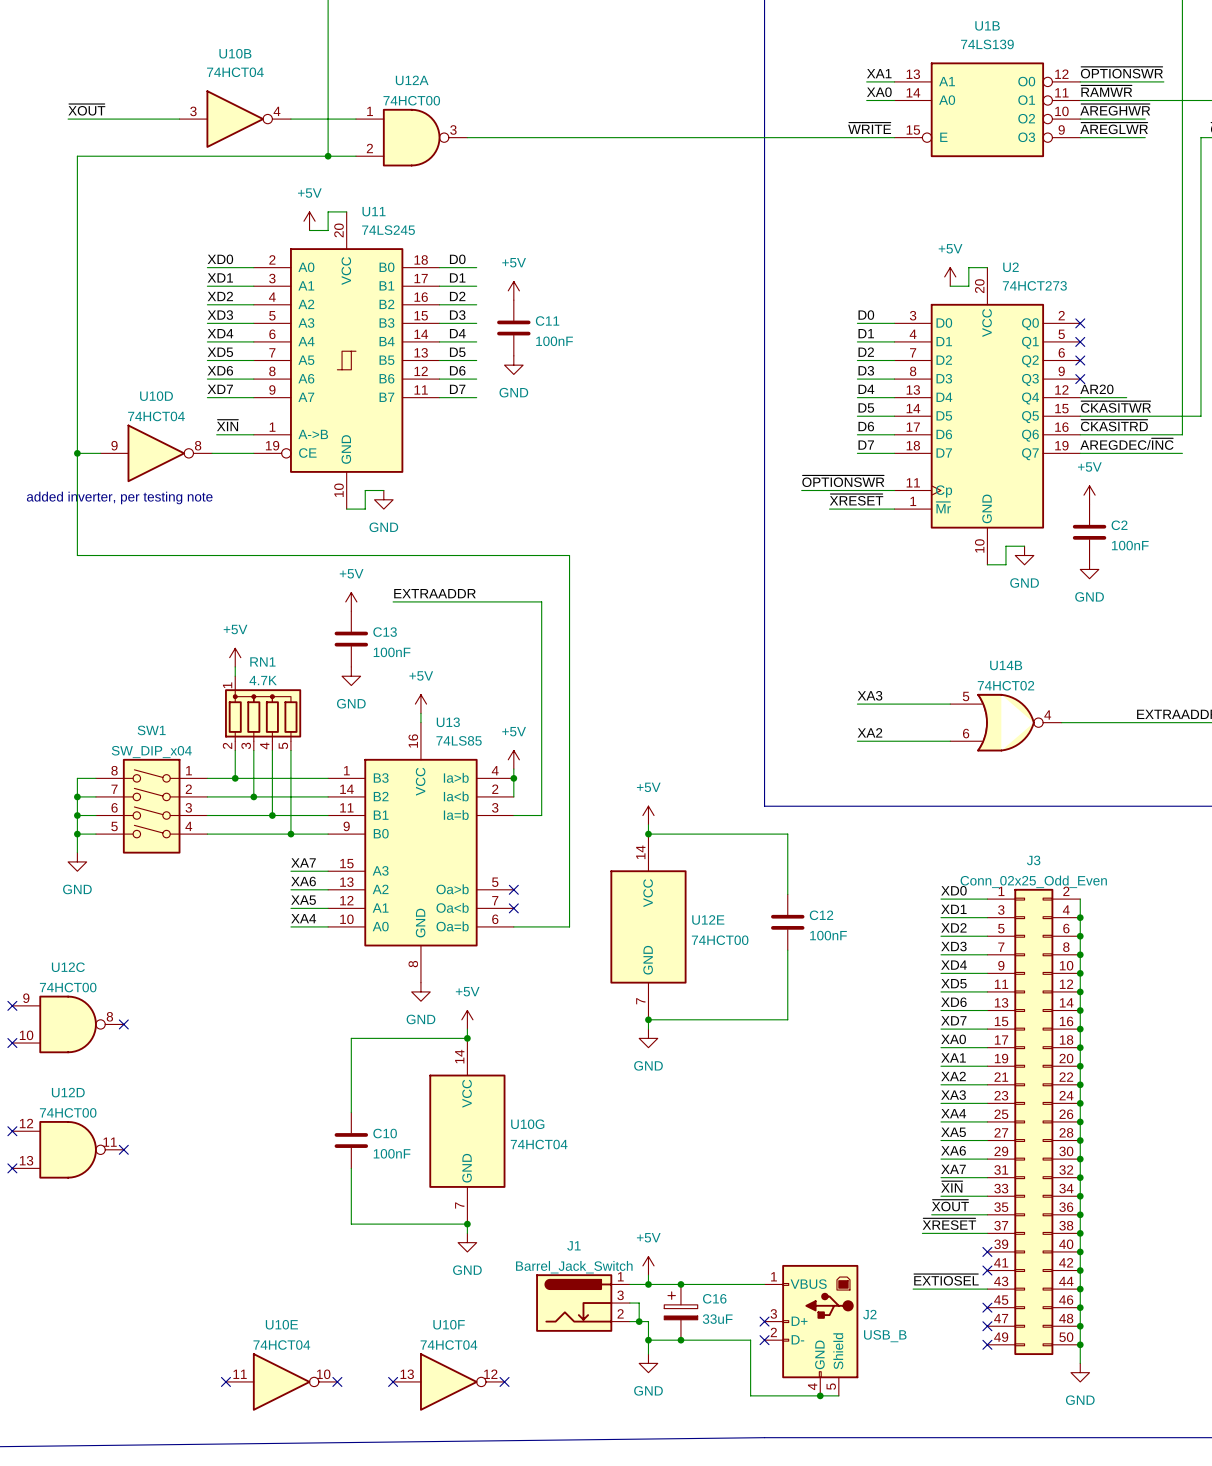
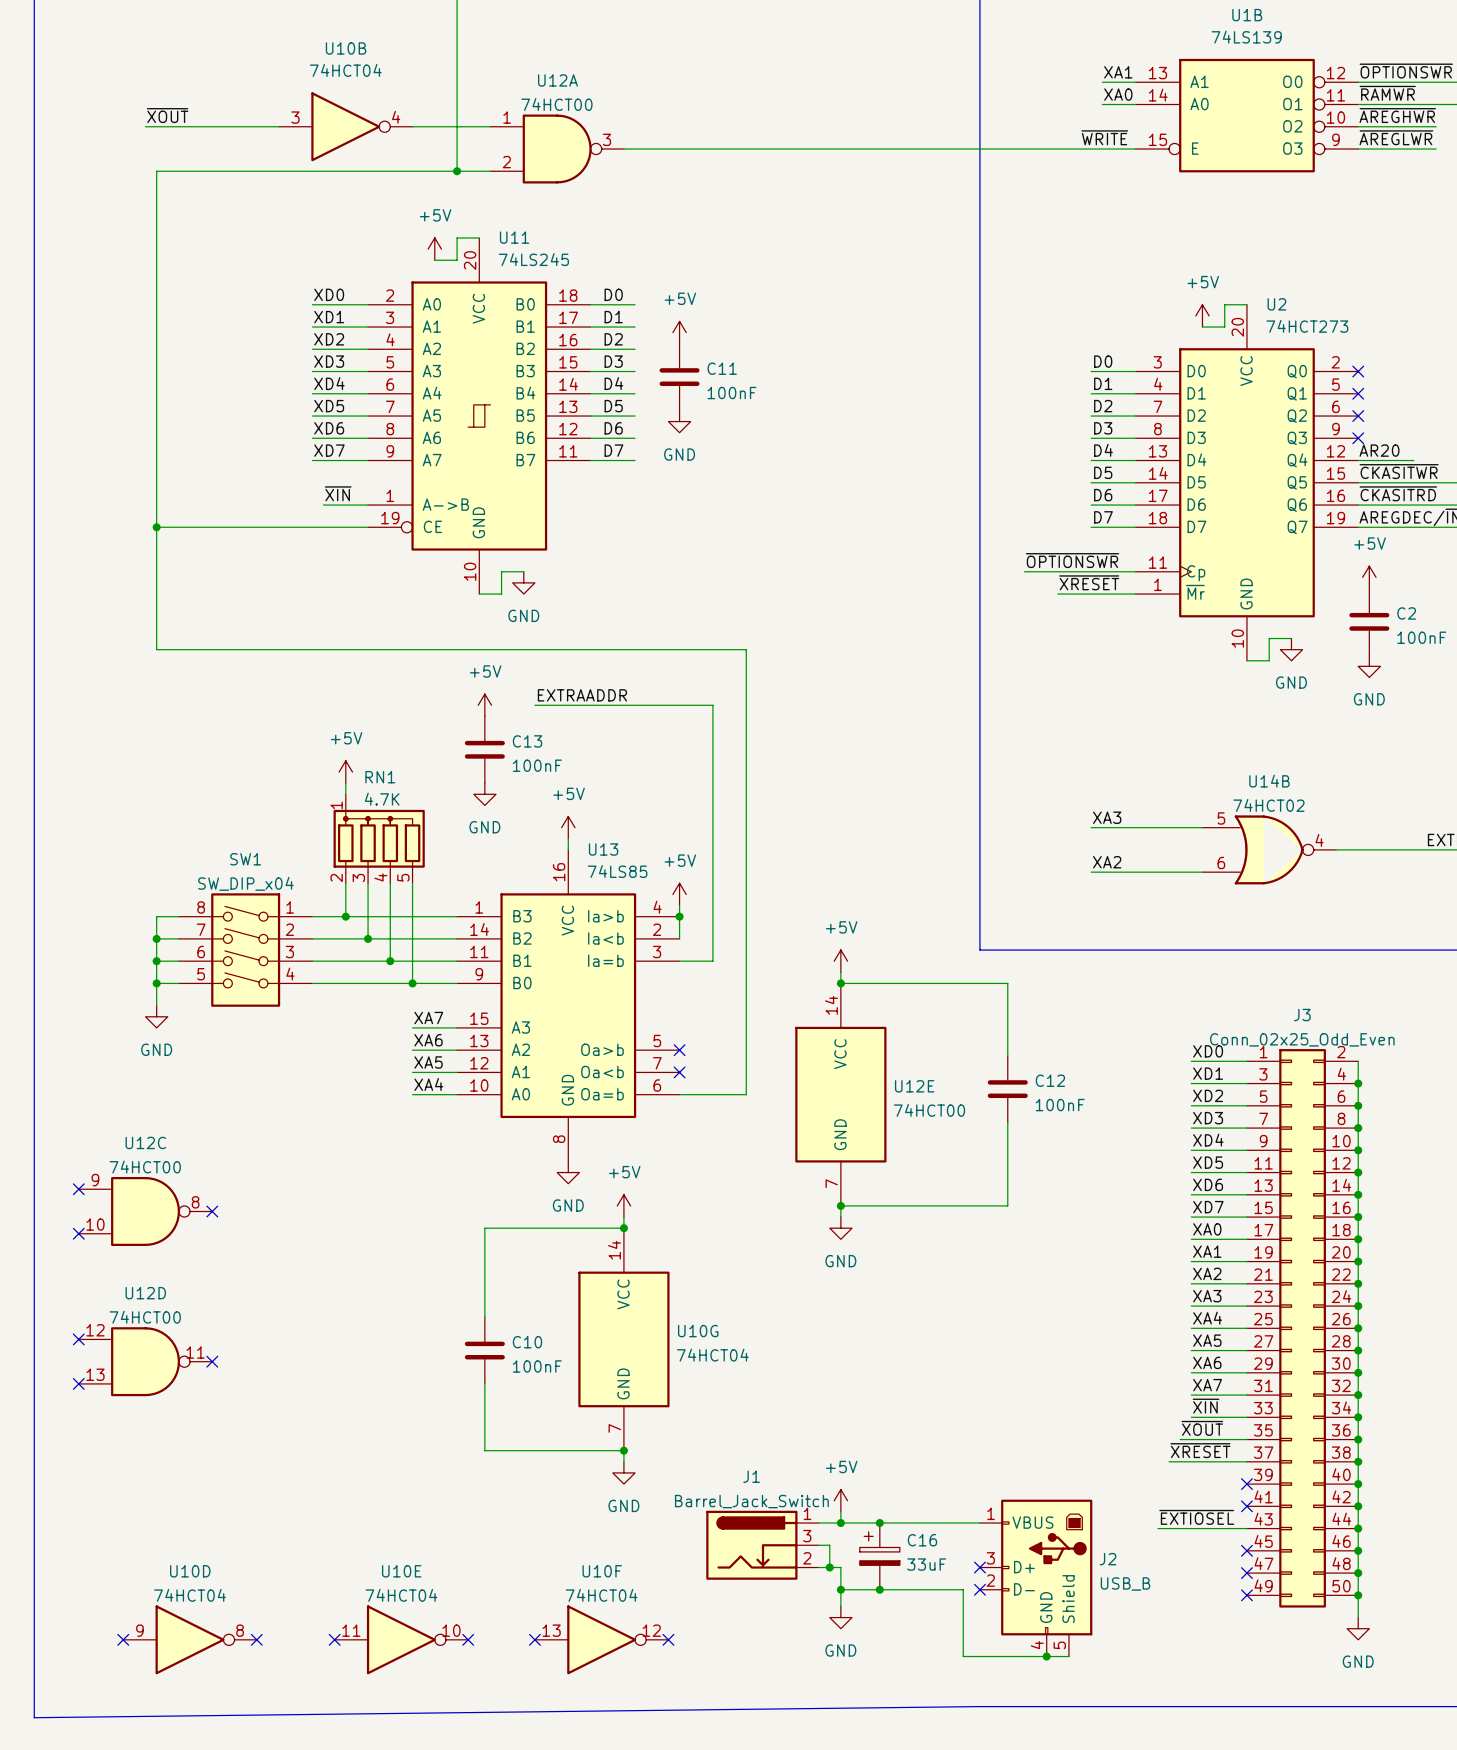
U10D position: (156, 453) -> (190, 1639)
text: added inverter, per testing note (119, 497) -> none
no-connect mark: none -> (123, 1639)
no-connect mark: none -> (256, 1639)

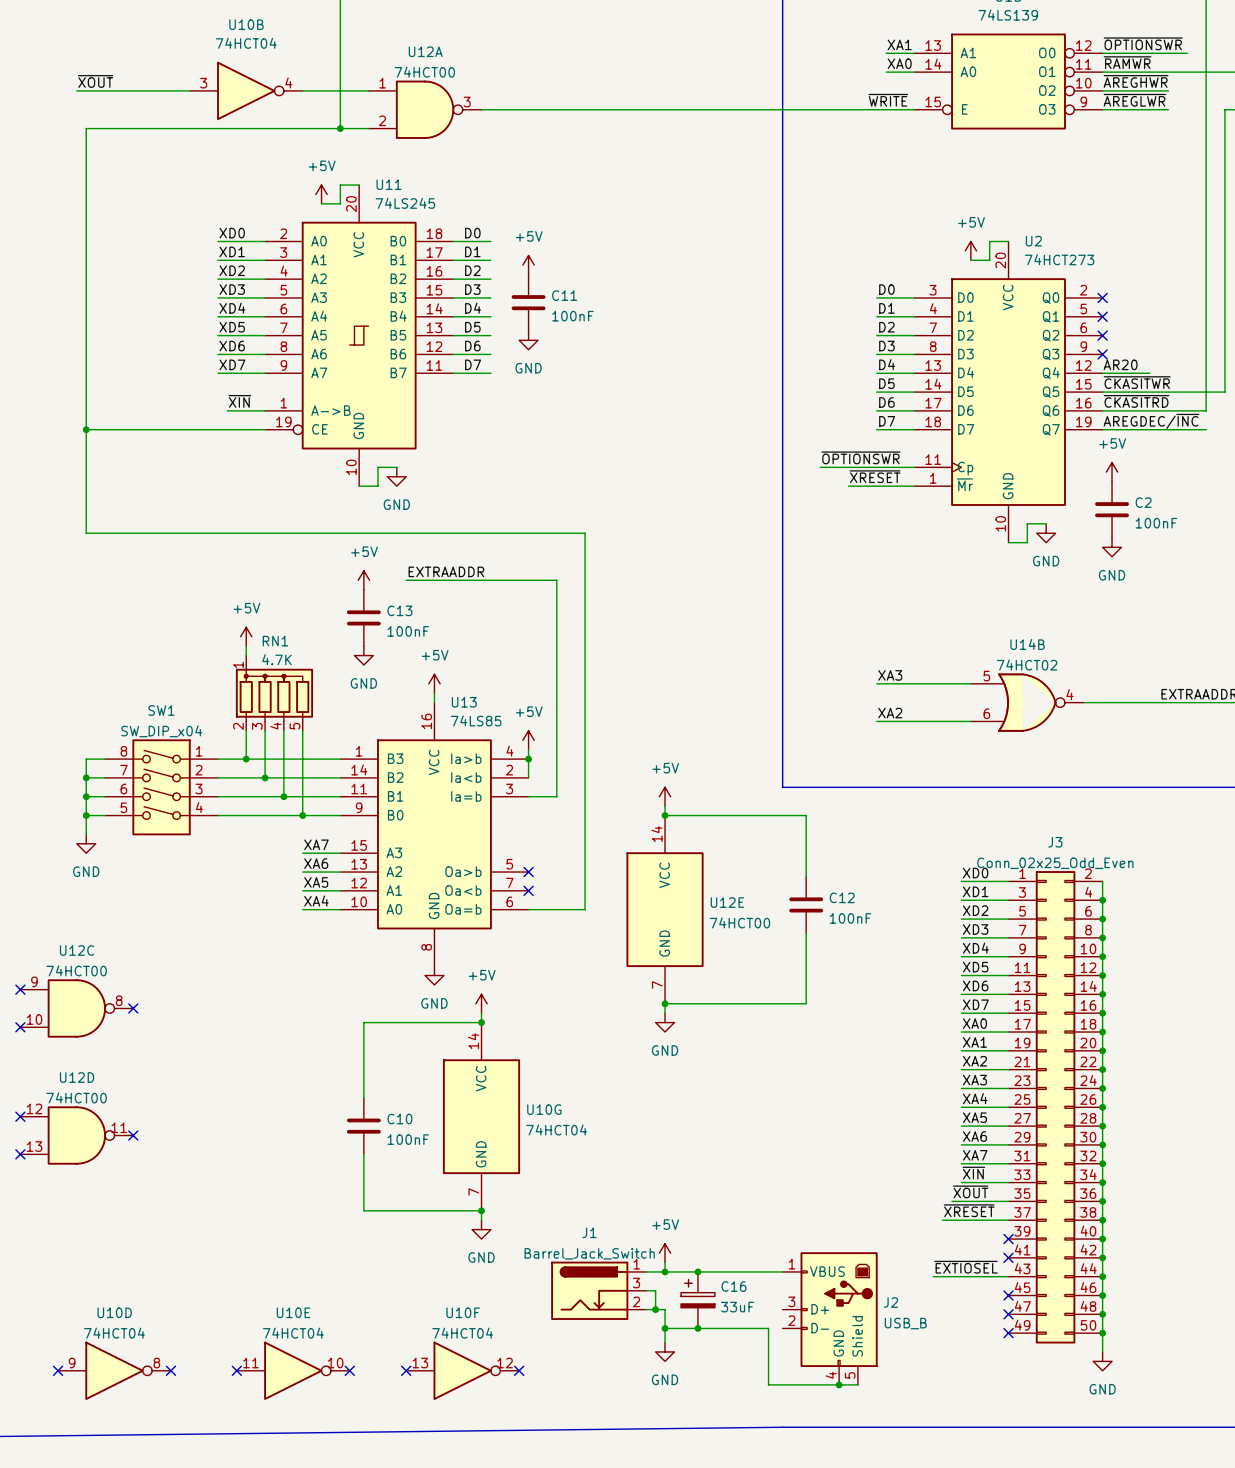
no-connect mark: (979, 1567) -> none
no-connect mark: (979, 1589) -> none

